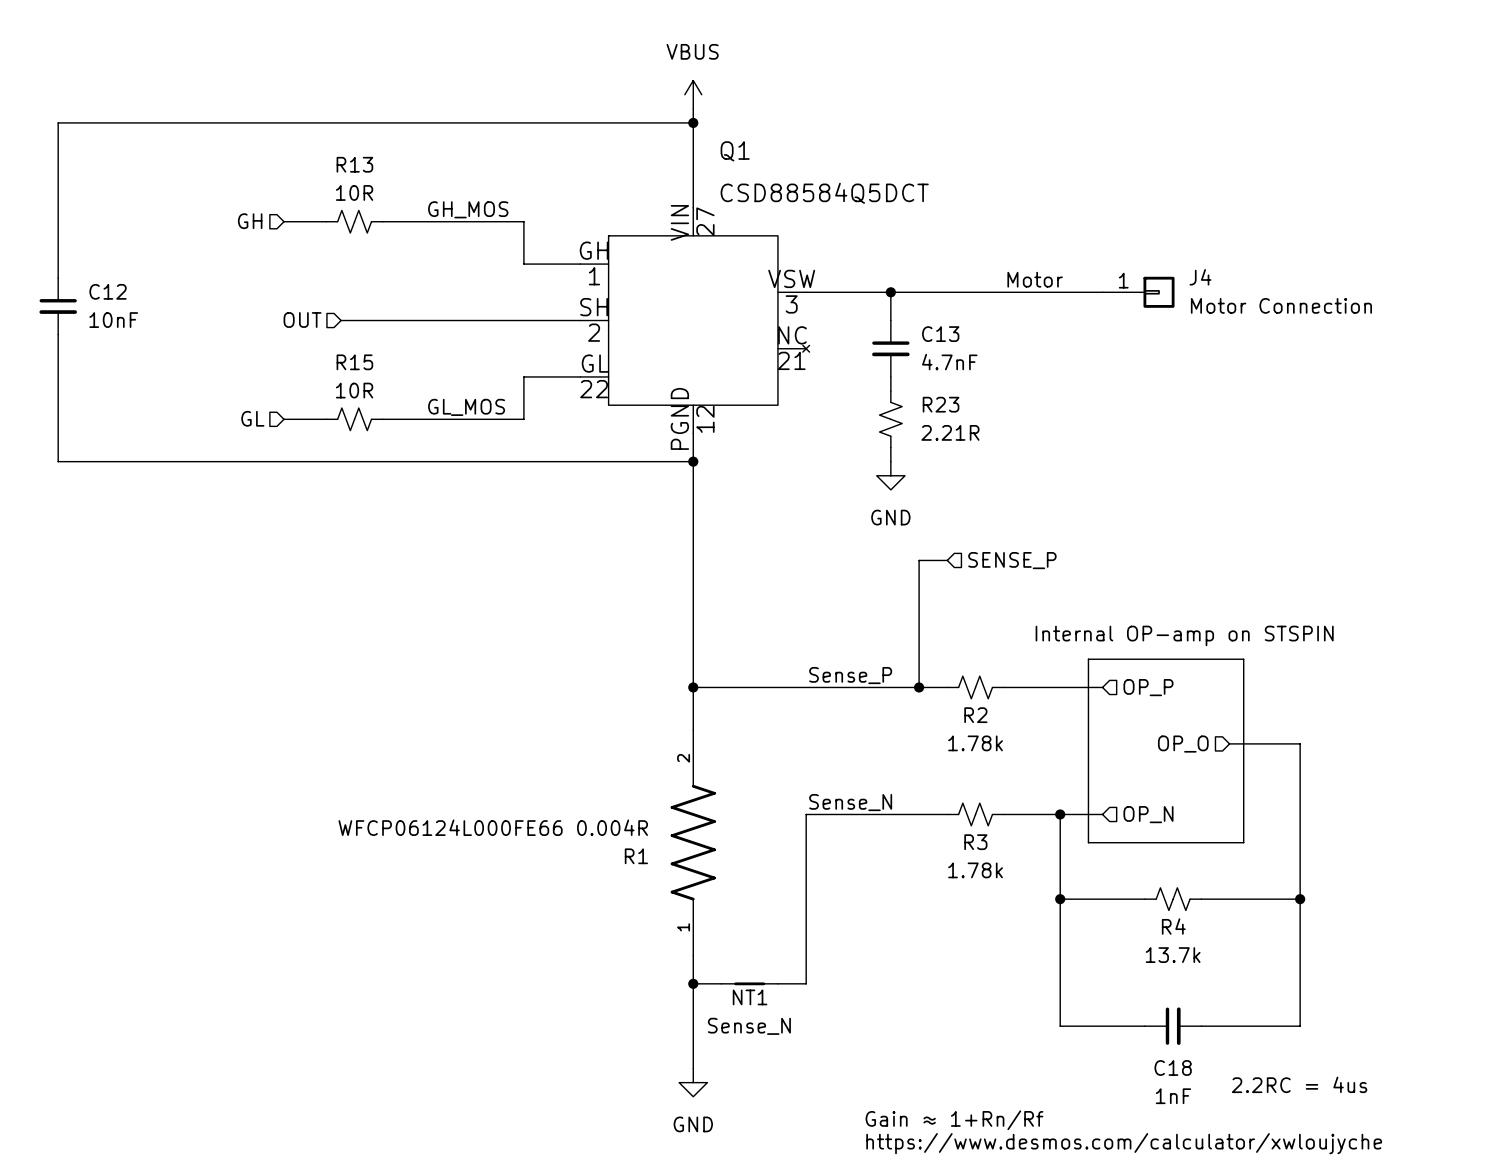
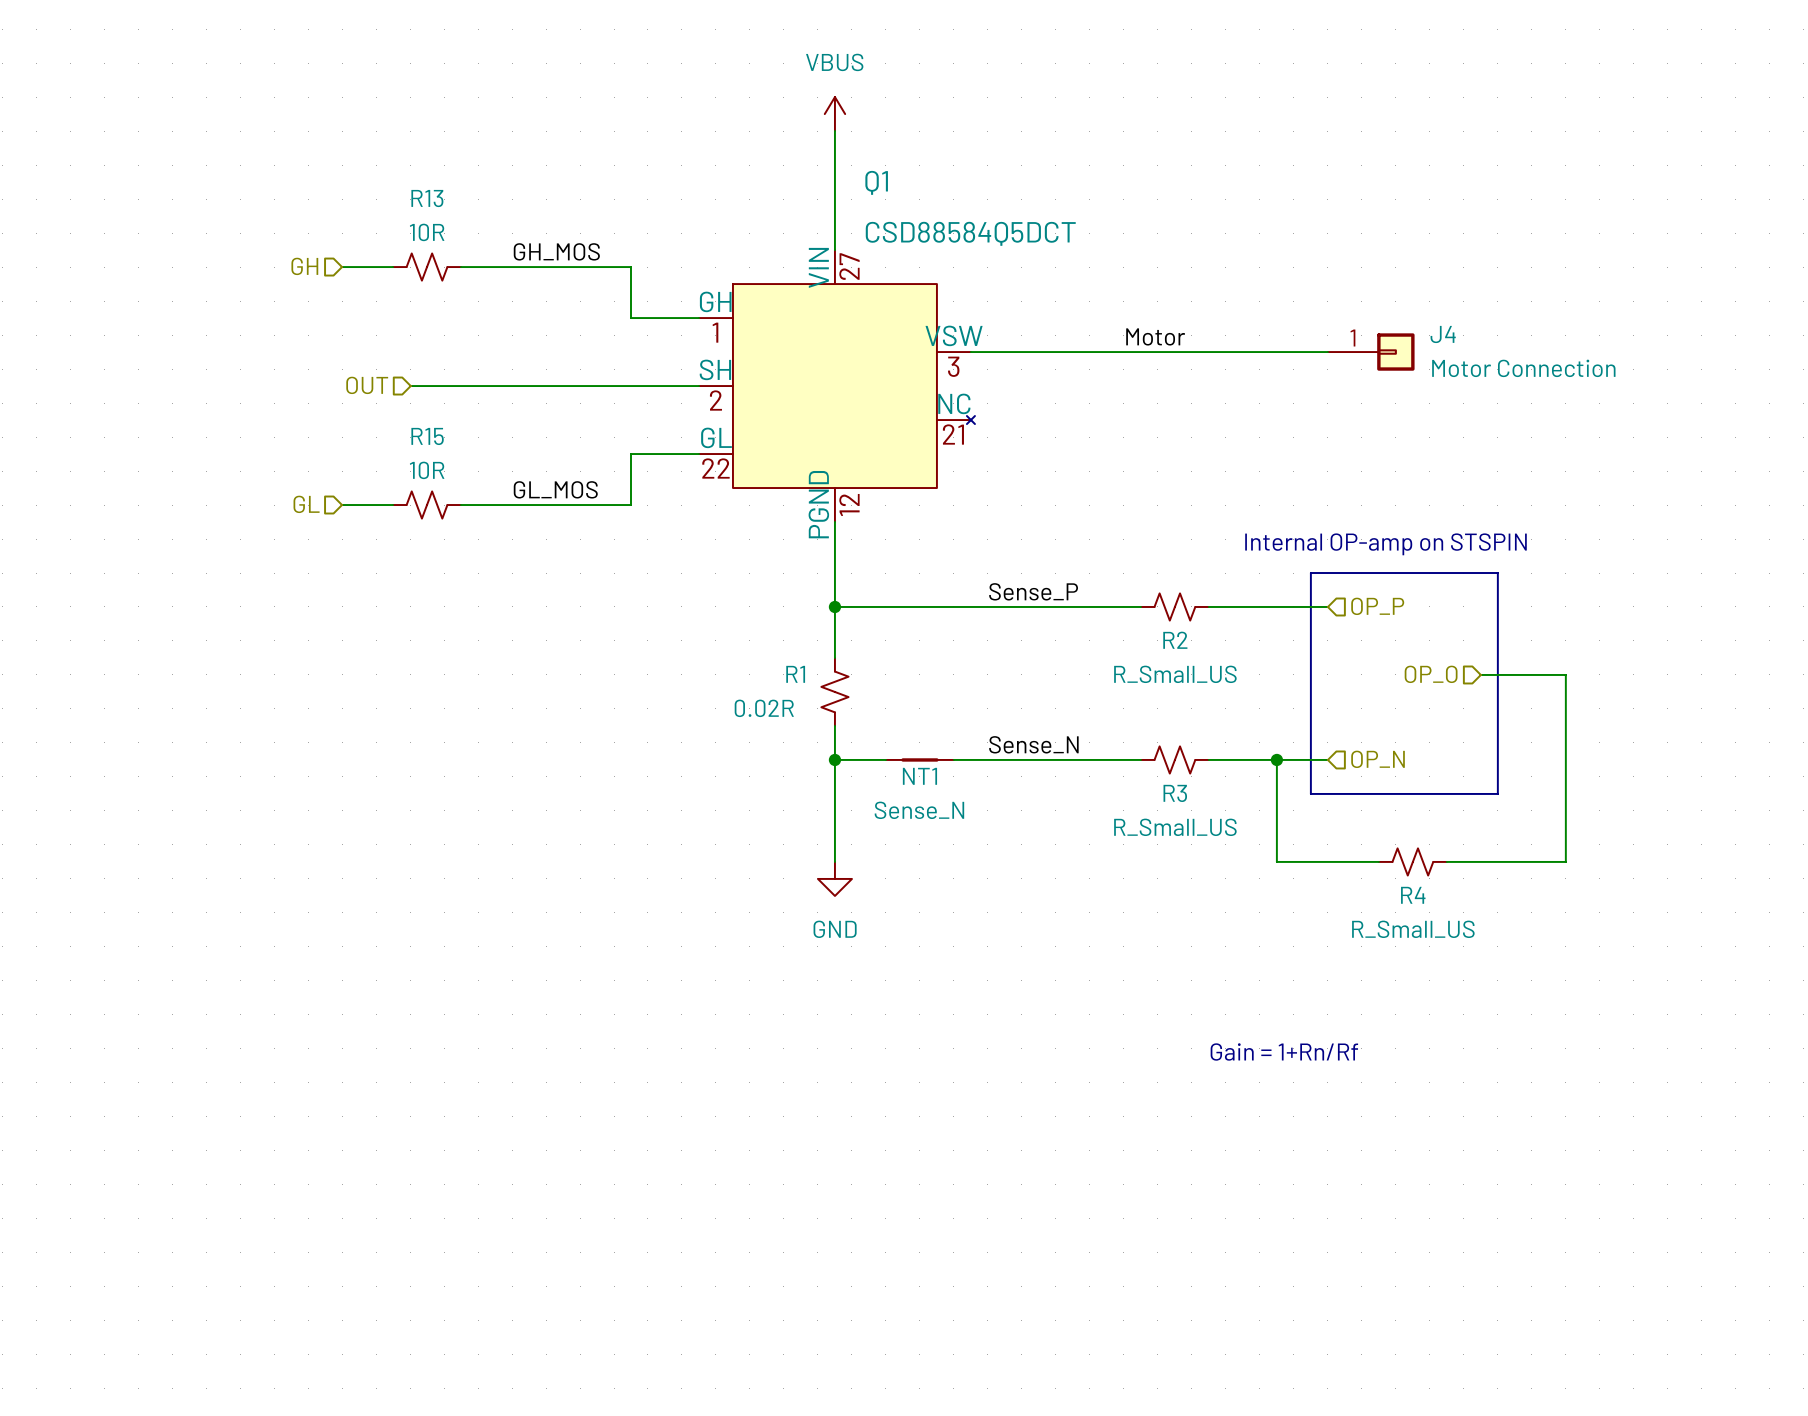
wire: (693, 122) (58, 122) (58, 278) -> none
junction: (693, 122) -> none
label position: Motor (1035, 279) -> Motor (1155, 336)
wire: (890, 292) (890, 320) -> none
junction: (890, 292) -> none
C12: 10nF (58, 306) -> none
wire: (58, 334) (58, 461) (693, 461) -> none
C13: 4.7nF (890, 348) -> none
wire: (890, 376) (890, 391) -> none
R23: 2.21R (890, 419) -> none
wire: (890, 447) (890, 461) -> none
junction position: (693, 461) -> (834, 606)
power symbol: GND (890, 475) -> none
wire: (947, 560) (919, 560) (919, 687) -> none
hierarchical label: SENSE_P (1012, 560) -> none
wire: none -> (1480, 674) (1565, 674) (1565, 861) (1446, 861)
wire: none -> (834, 759) (885, 759)
wire: none -> (953, 759) (1140, 759)
wire: none -> (1276, 759) (1276, 861) (1378, 861)
junction: none -> (1276, 759)
text position: Internal OP-amp on STSPIN (1184, 635) -> Internal OP-amp on STSPIN (1385, 544)
line: (1088, 659) (1088, 842) (1243, 842) (1243, 659) -> (1310, 793) (1310, 573) (1497, 573) (1497, 793)
label position: Sense_P (850, 675) -> Sense_P (1033, 591)
wire: (693, 687) (947, 687) -> (834, 606) (1140, 606)
junction position: (693, 687) -> (834, 759)
junction: (919, 687) -> none
R2 position: (975, 687) -> (1174, 606)
wire: (1003, 687) (1102, 687) -> (1208, 606) (1327, 606)
hierarchical label position: OP_P (1148, 687) -> OP_P (1377, 606)
R1 symbol: [670, 729, 716, 956] -> [821, 657, 849, 726]
power symbol: none -> GND (834, 878)
R2 value: 1.78k (975, 743) -> R_Small_US (1175, 674)
wire: (1229, 743) (1300, 743) (1300, 1026) (1201, 1026) -> none
hierarchical label position: OP_O (1183, 744) -> OP_O (1431, 674)
label position: Sense_N (850, 802) -> Sense_N (1033, 744)
wire: (947, 814) (806, 814) (806, 983) (777, 983) -> none
R3 position: (975, 814) -> (1174, 759)
wire: (1003, 814) (1102, 814) -> (1208, 759) (1327, 759)
wire: (1060, 814) (1060, 1026) (1144, 1026) -> none
junction: (1060, 814) -> none
hierarchical label position: OP_N (1148, 814) -> OP_N (1378, 759)
R1 value: WFCP06124L000FE66 0.004R (493, 827) -> 0.02R (764, 708)
R1 name position: R1 (636, 856) -> R1 (795, 674)
R3 value: 1.78k (975, 870) -> R_Small_US (1175, 827)
text: none -> Gain = 1+Rn/Rf (1284, 1051)
wire: (1060, 899) (1144, 899) -> none
junction: (1060, 899) -> none
R4 position: (1173, 899) -> (1412, 861)
wire: (1201, 899) (1300, 899) -> none
junction: (1300, 899) -> none
wire: (693, 955) (693, 1068) -> none
R4 value: 13.7k (1173, 955) -> R_Small_US (1413, 929)
wire: (693, 983) (721, 983) -> none
junction: (693, 983) -> none
NT1 position: (749, 983) -> (919, 759)
C18: 1nF (1173, 1026) -> none
power symbol: GND (693, 1082) -> none
text: 2.2RC = 4us (1299, 1084) -> none
text: Gain ≈ 1+Rn/Rf (954, 1120) -> none
text: https://www.desmos.com/calculator/xwloujyche (1124, 1143) -> none

